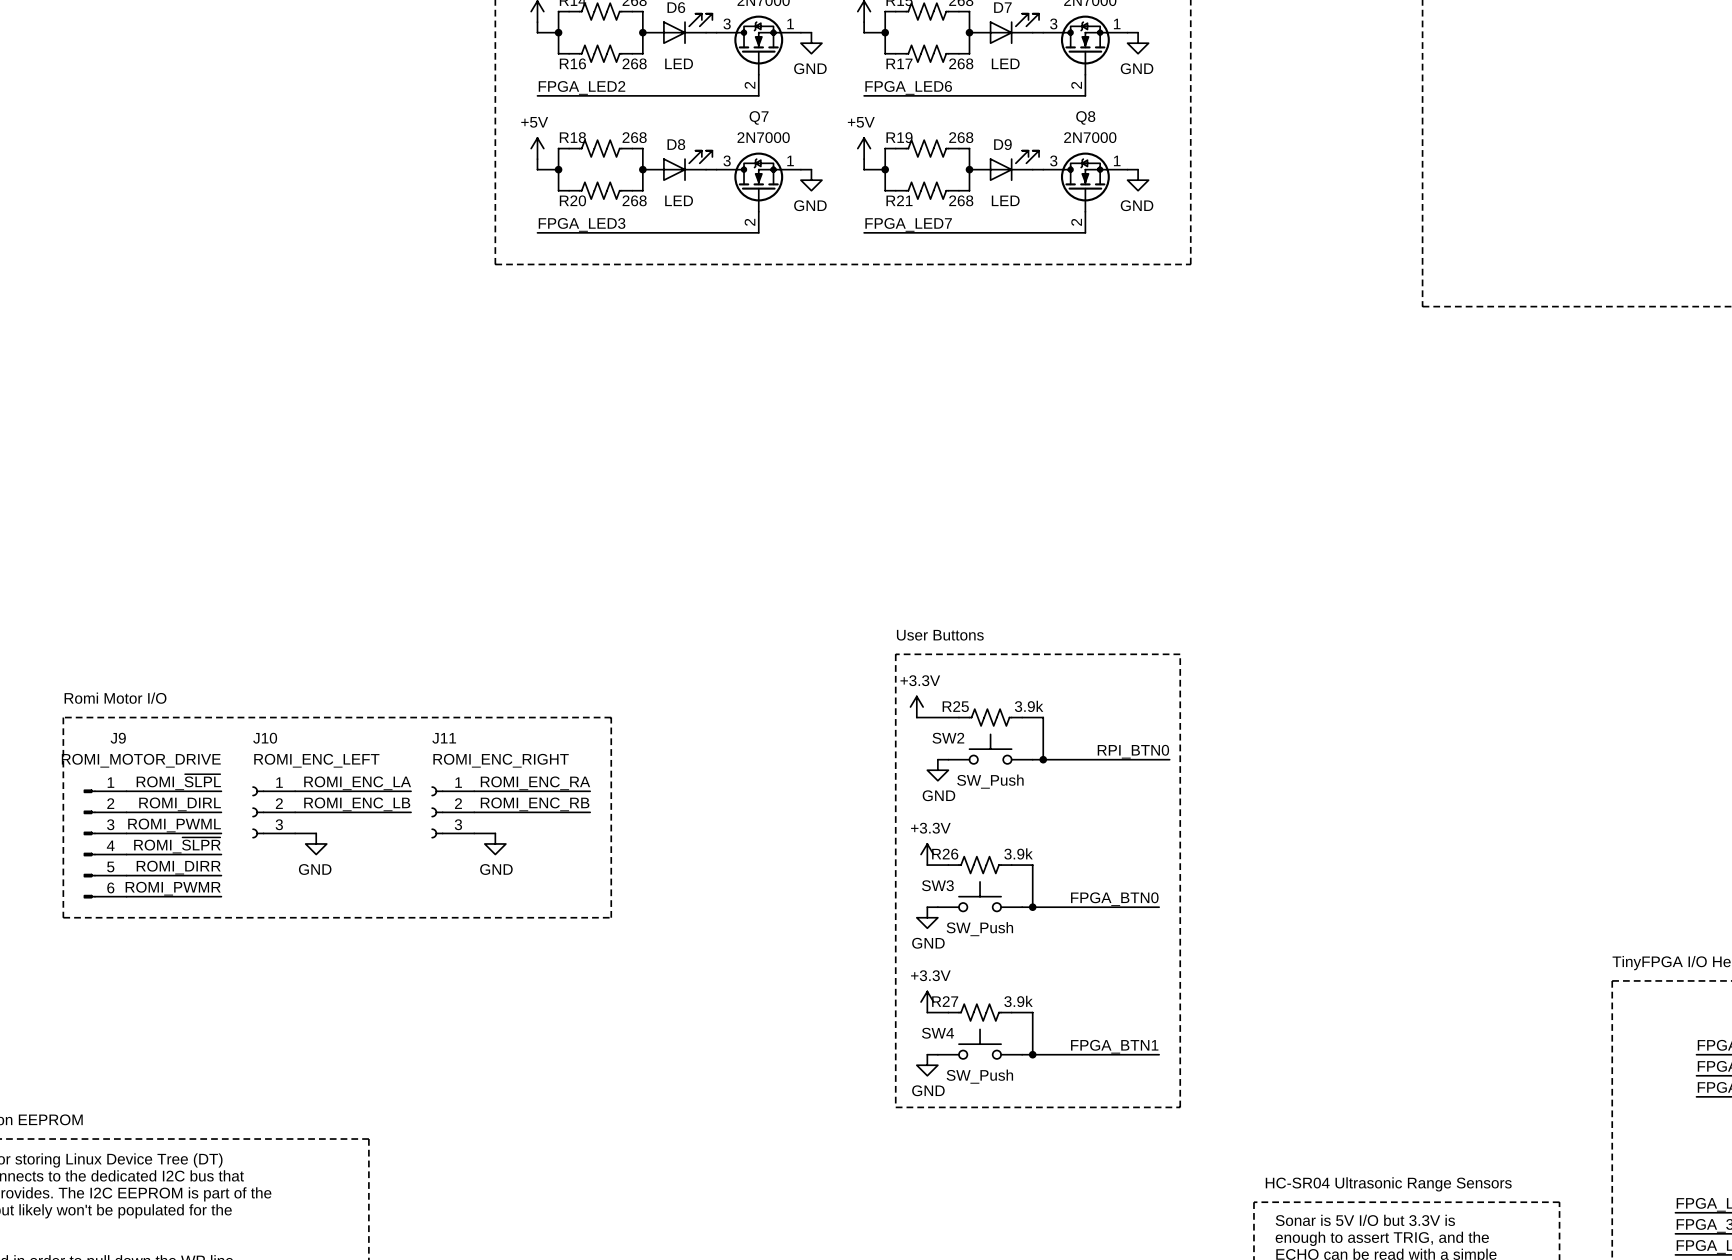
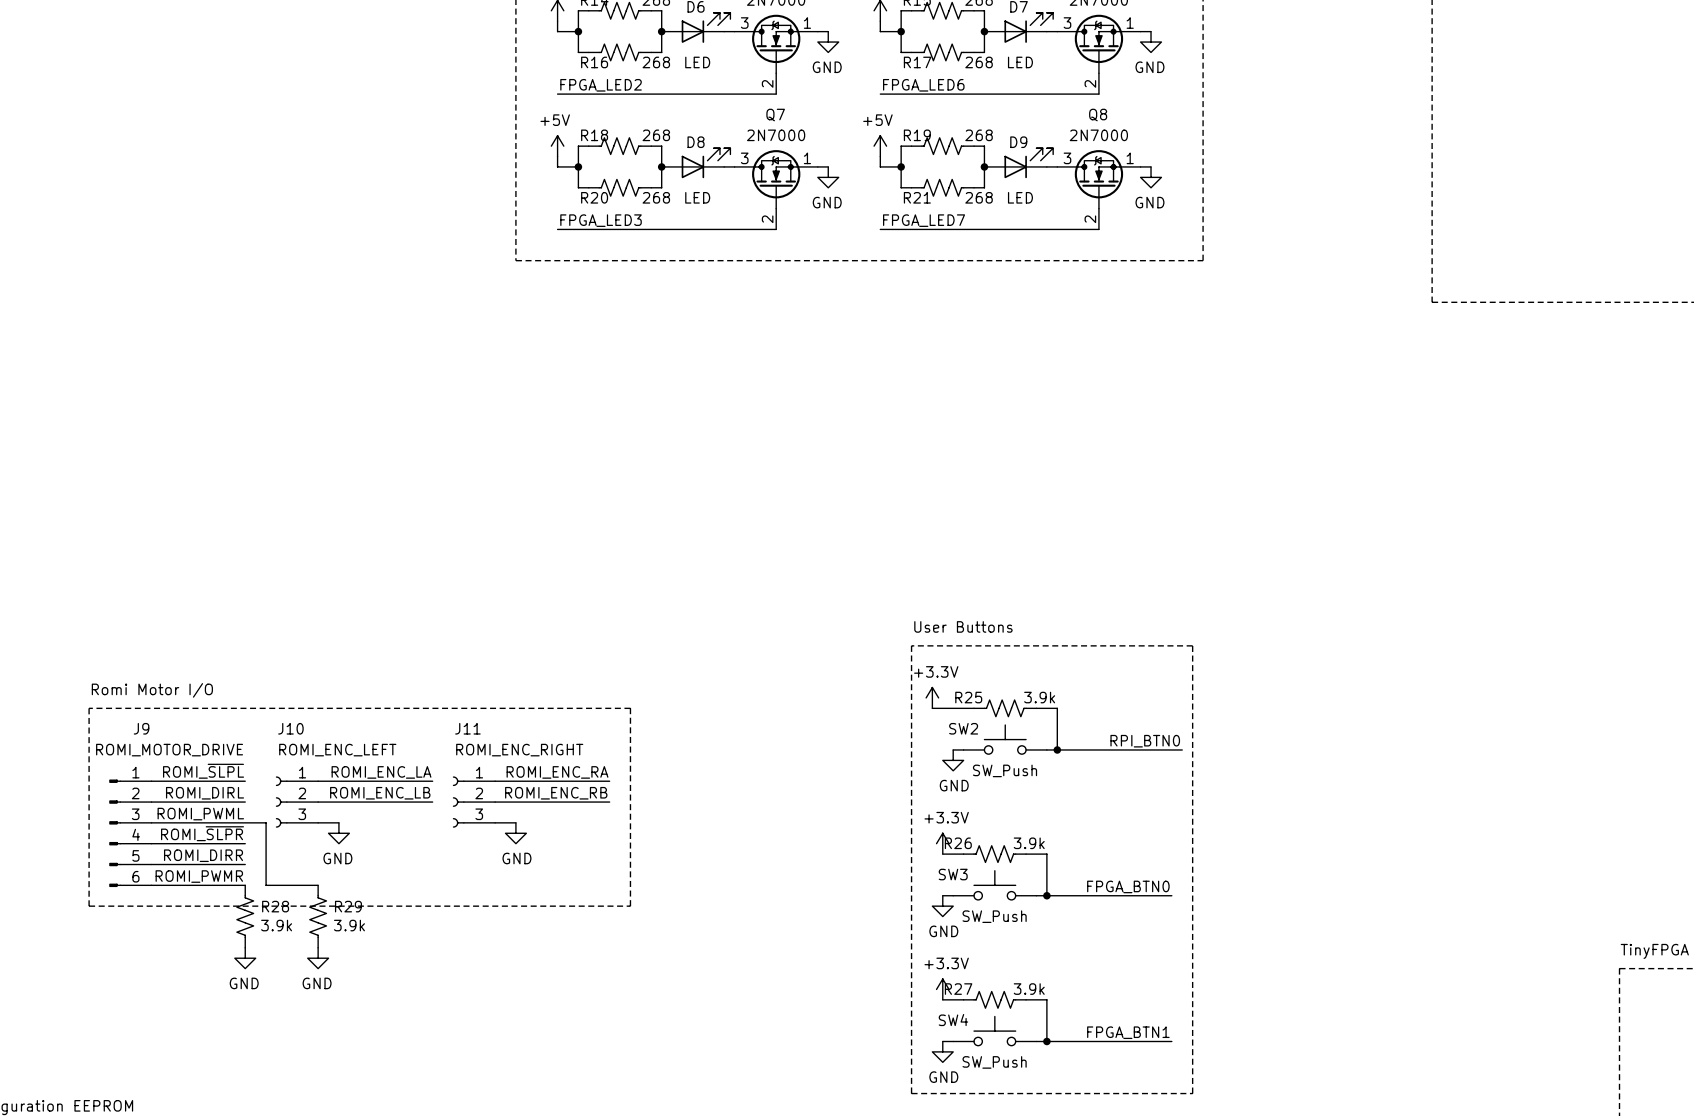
wire: none -> (245, 822) (266, 822) (266, 885) (318, 885)
R28: none -> 3.9k (245, 916)
R29: none -> 3.9k (318, 916)
power symbol: none -> GND (245, 958)
power symbol: none -> GND (318, 958)

